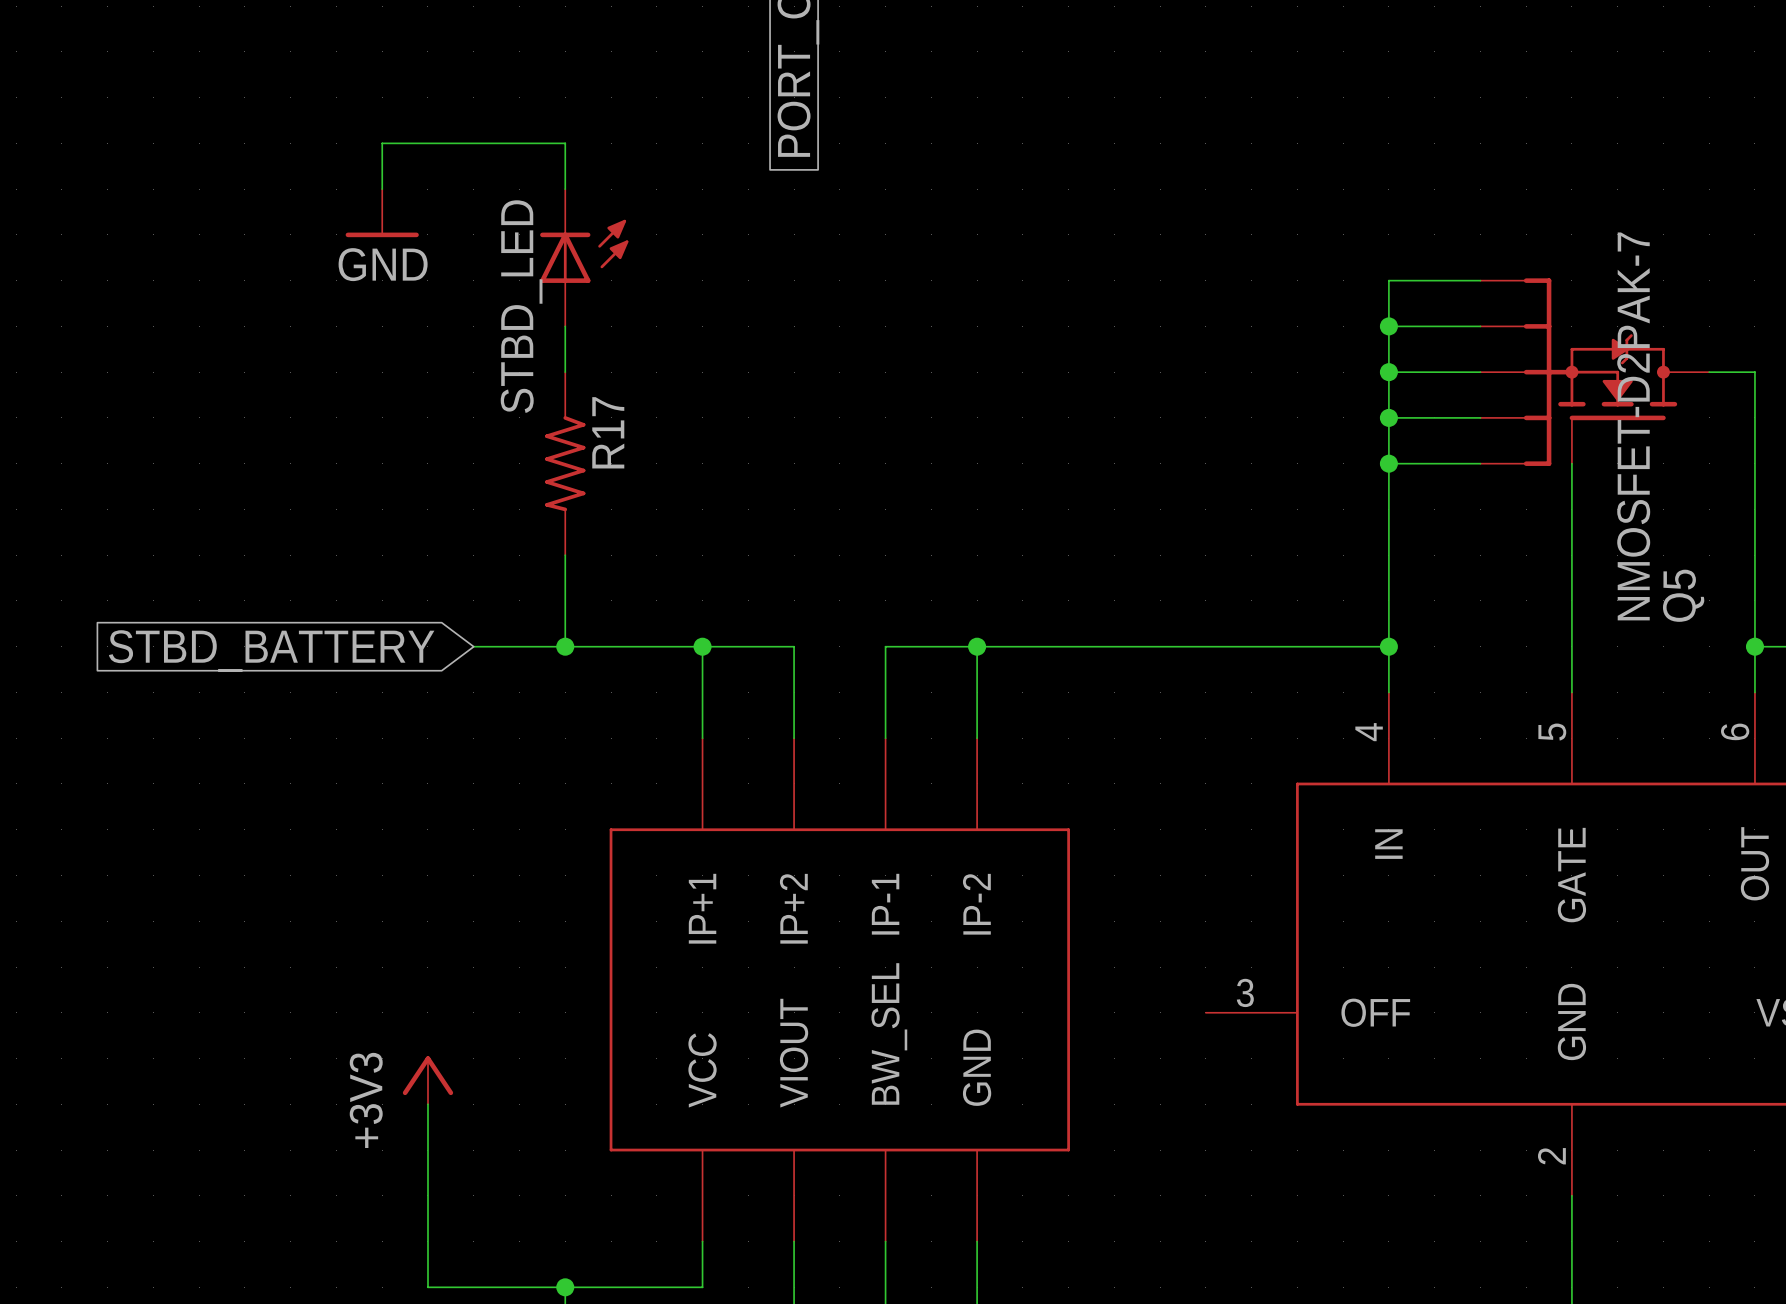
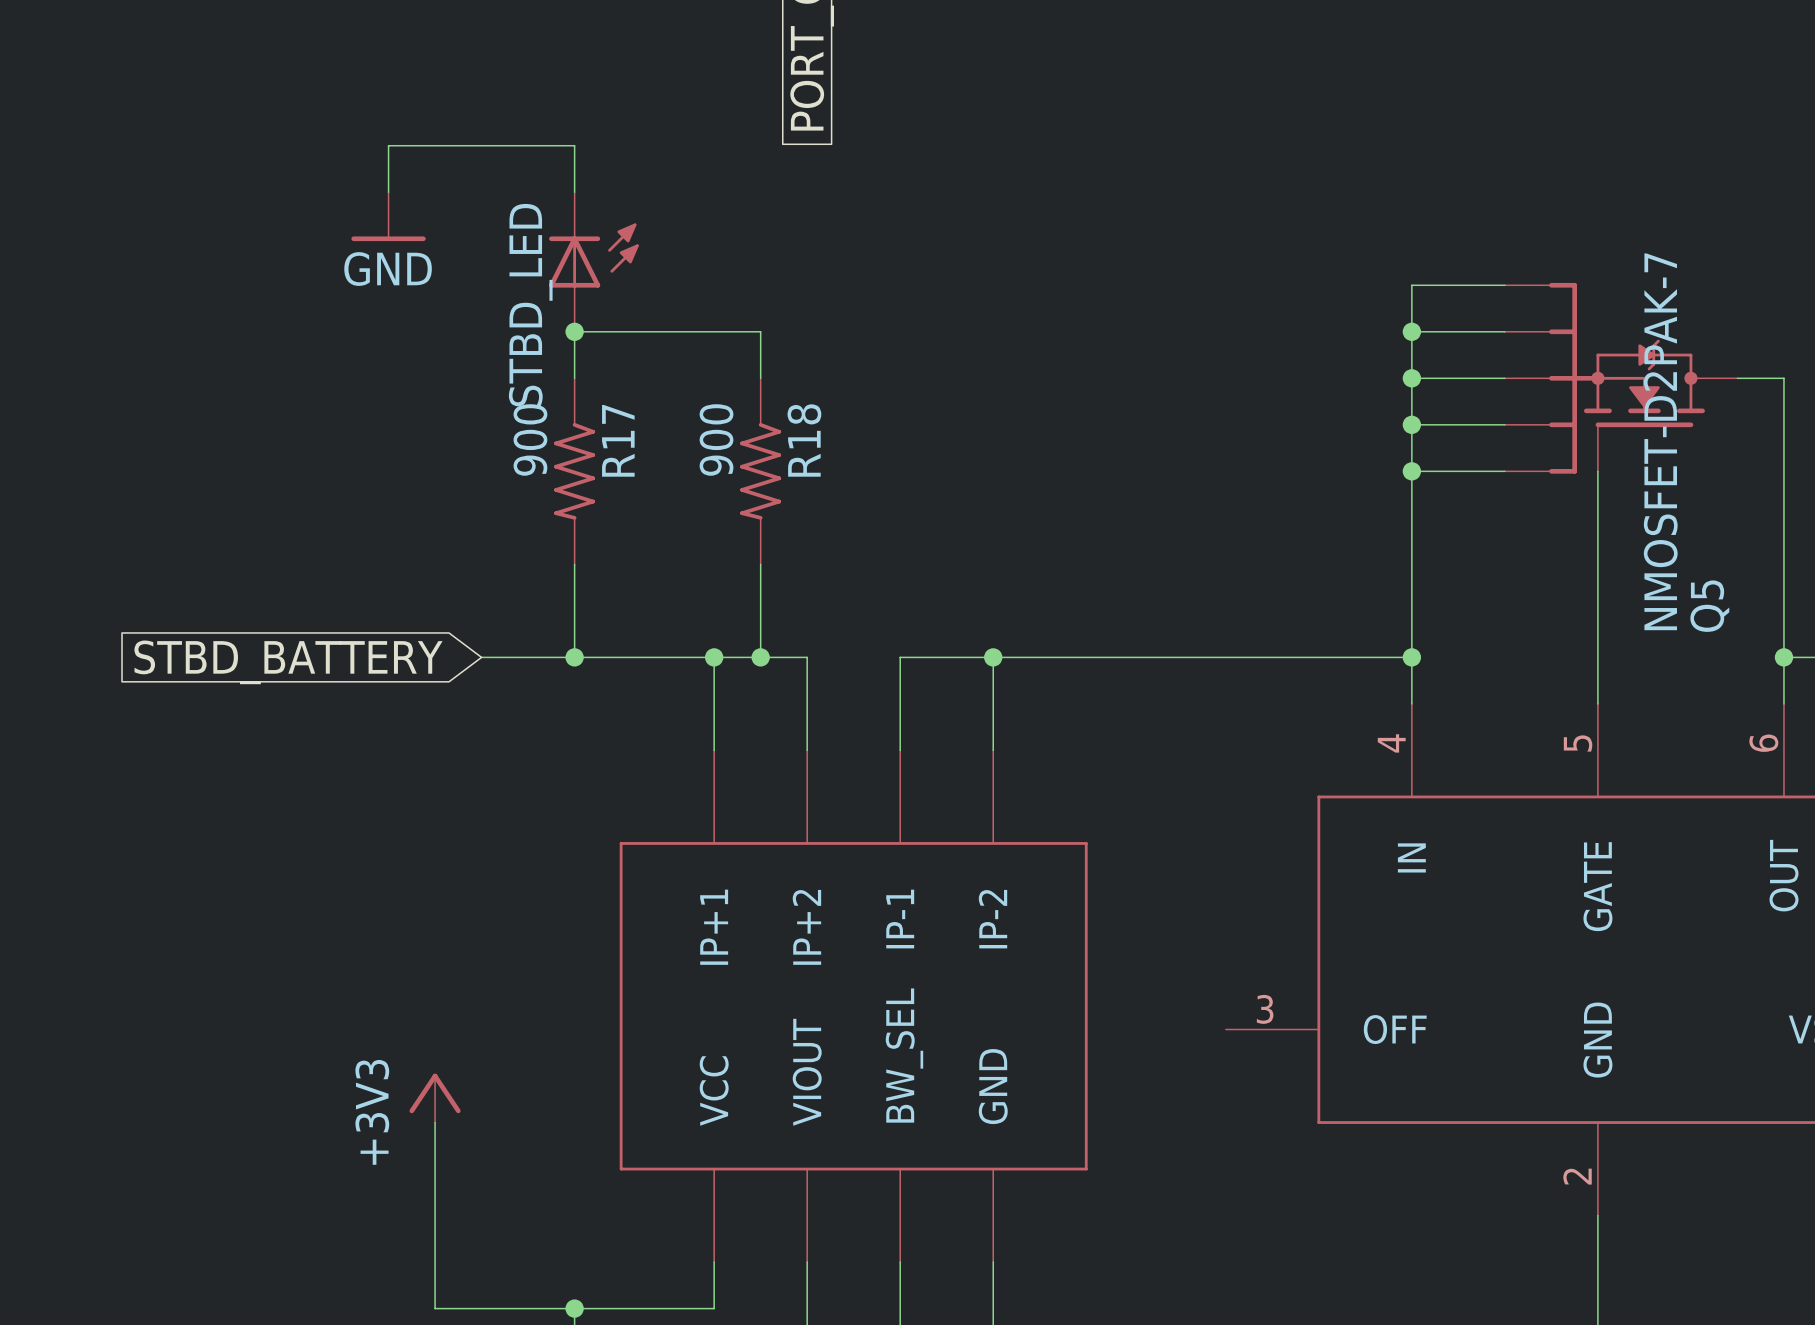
wire: none -> (574, 331) (760, 331) (760, 378)
junction: none -> (574, 331)
R17 value: none -> 900 (530, 439)
R18: none -> 900 (760, 471)
wire: none -> (760, 564) (760, 657)
junction: none -> (760, 657)

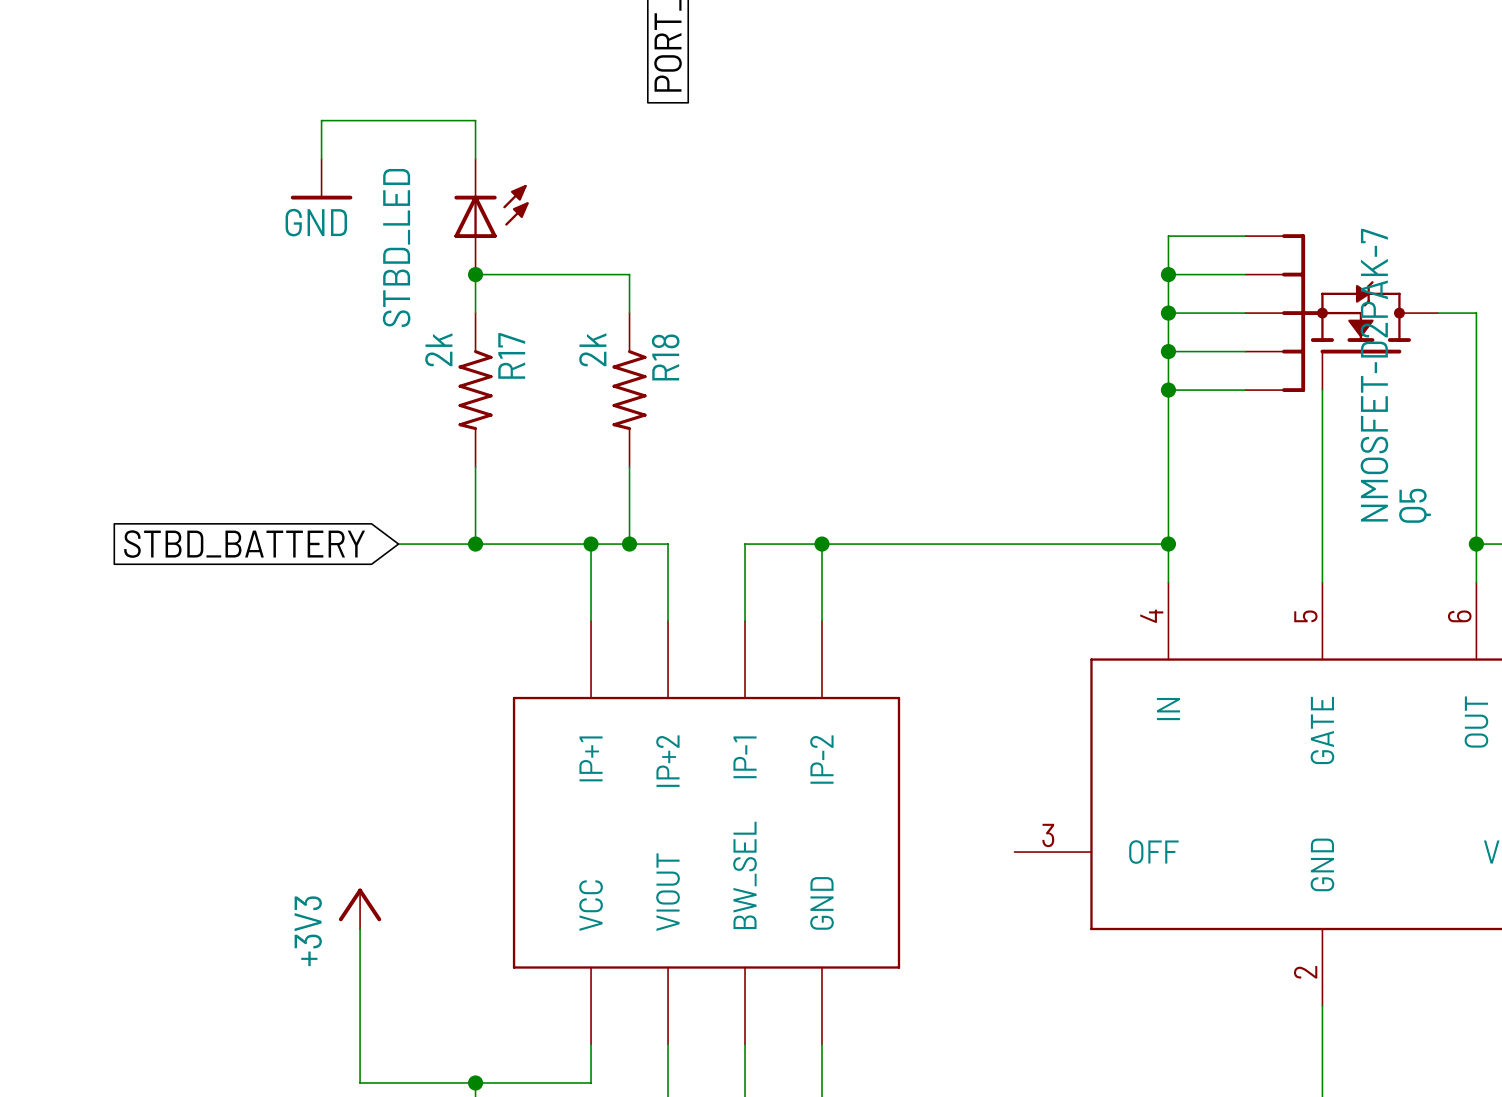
STBD_LED name position: STBD_LED (530, 305) -> STBD_LED (396, 247)
R17 value: 900 (530, 439) -> 2k (438, 349)
R18 value: 900 (716, 439) -> 2k (592, 349)

